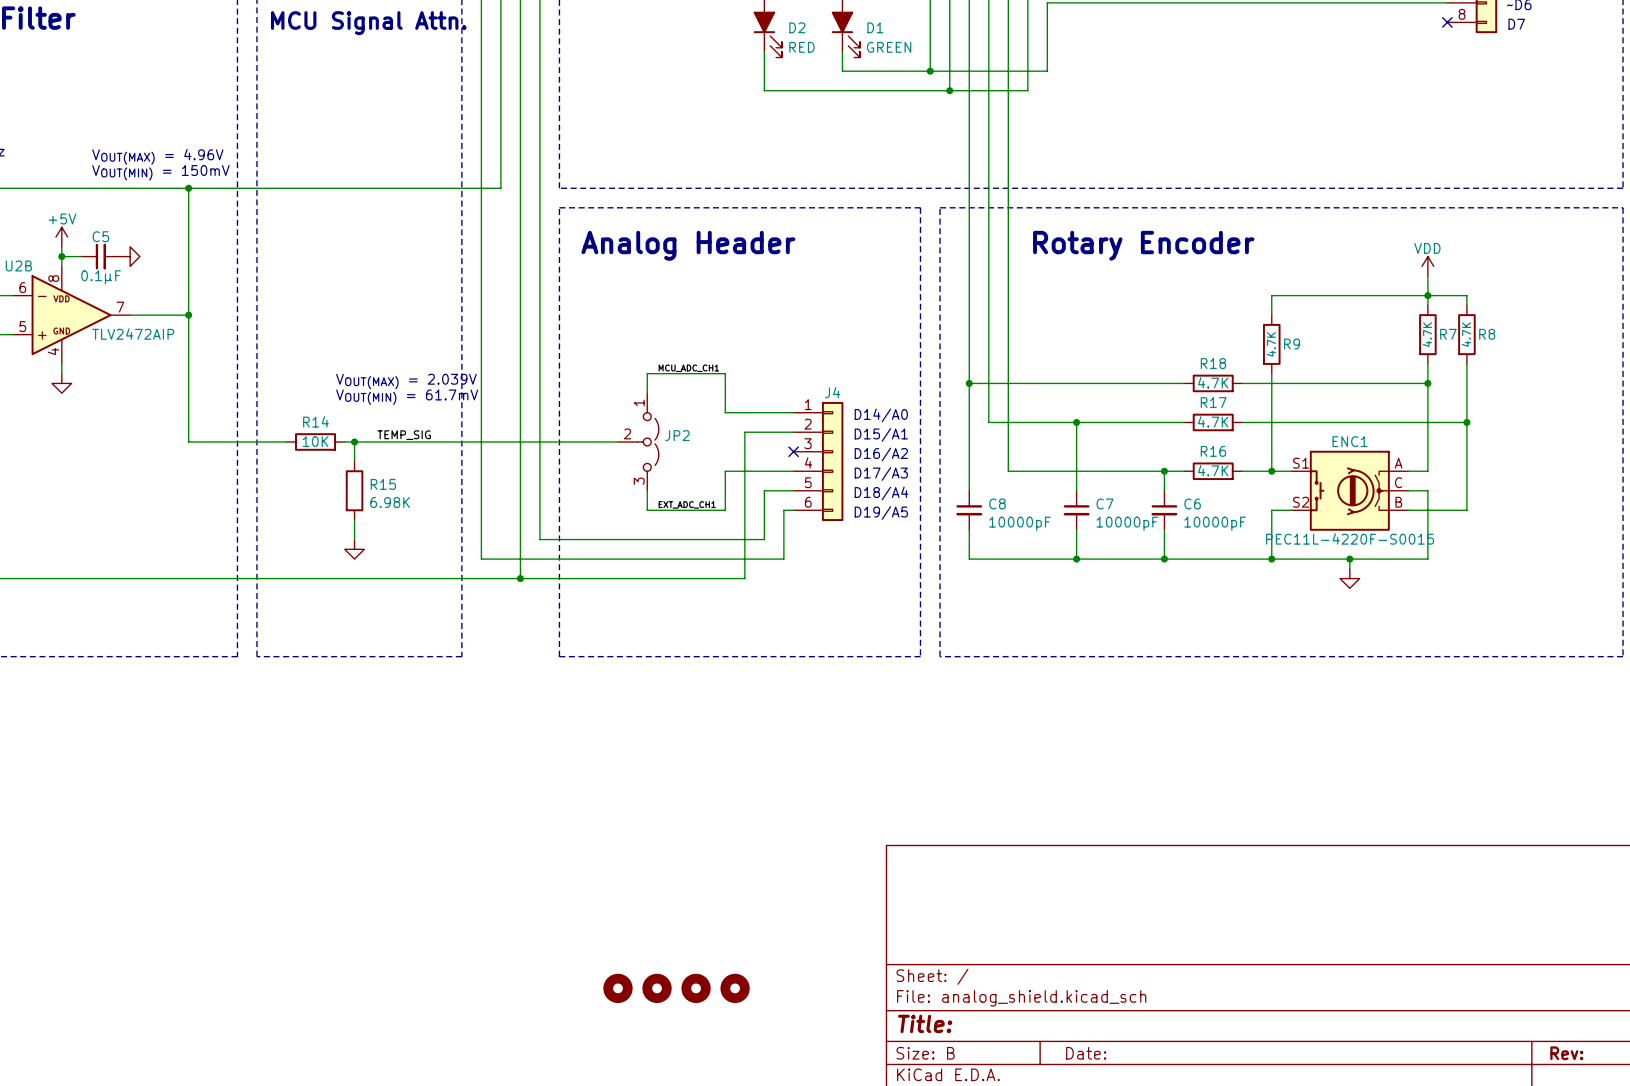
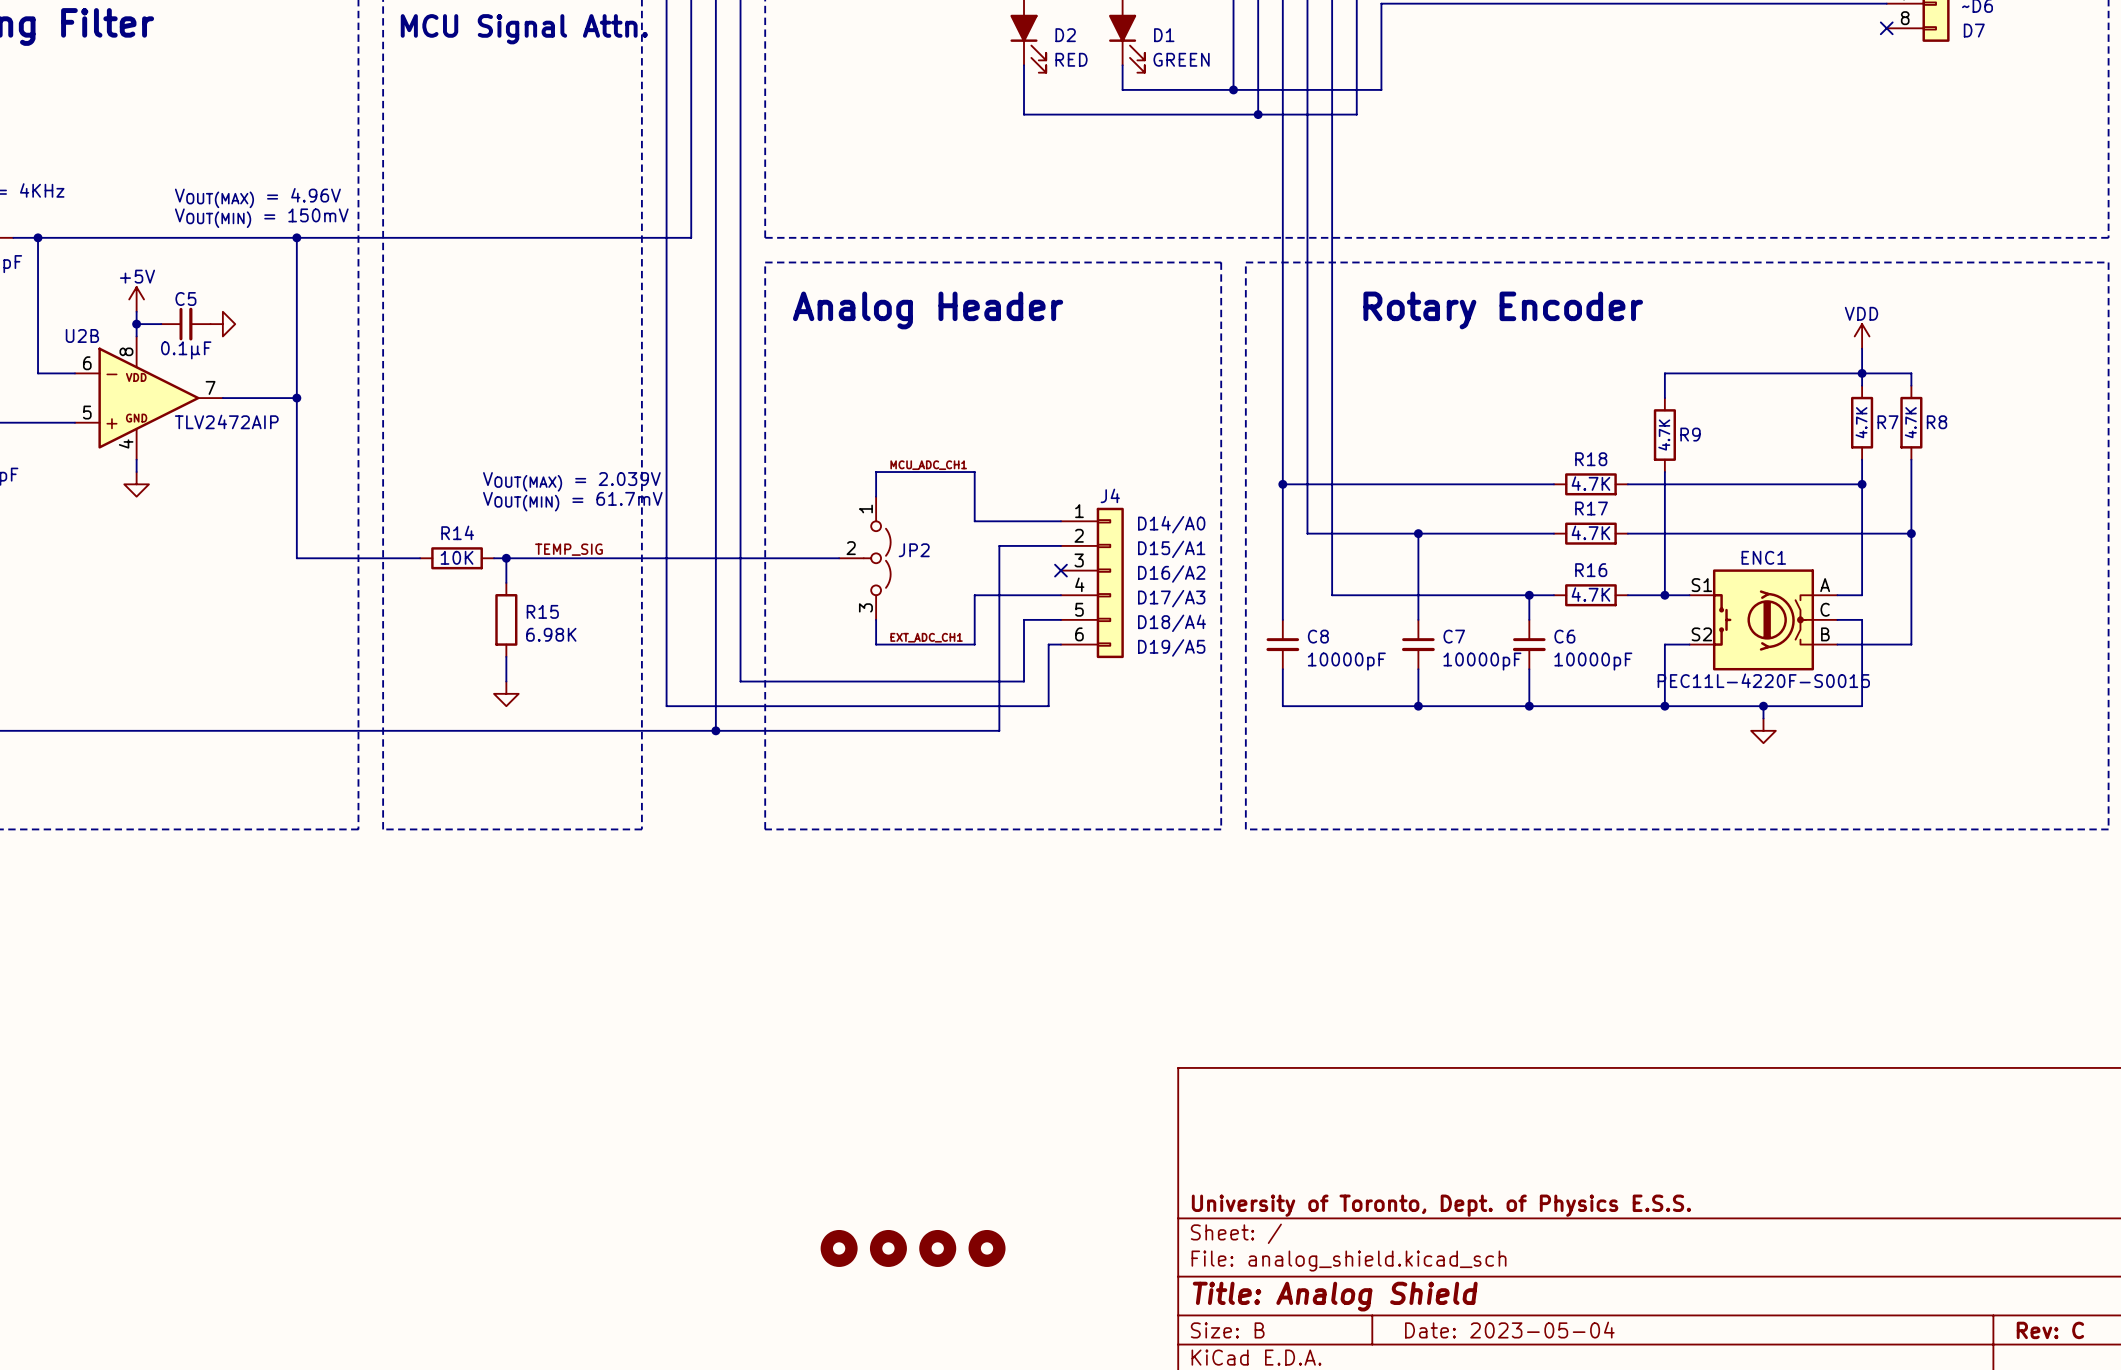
title block: none -> University of Toronto, Dept. of Physics E.S.S. (1441, 1205)
title block: Title: (925, 1023) -> Title: Analog Shield (1335, 1296)
title block: Date: (1086, 1053) -> Date: 2023-05-04 (1509, 1330)
title block: Rev: (1566, 1053) -> Rev: C (2050, 1330)

